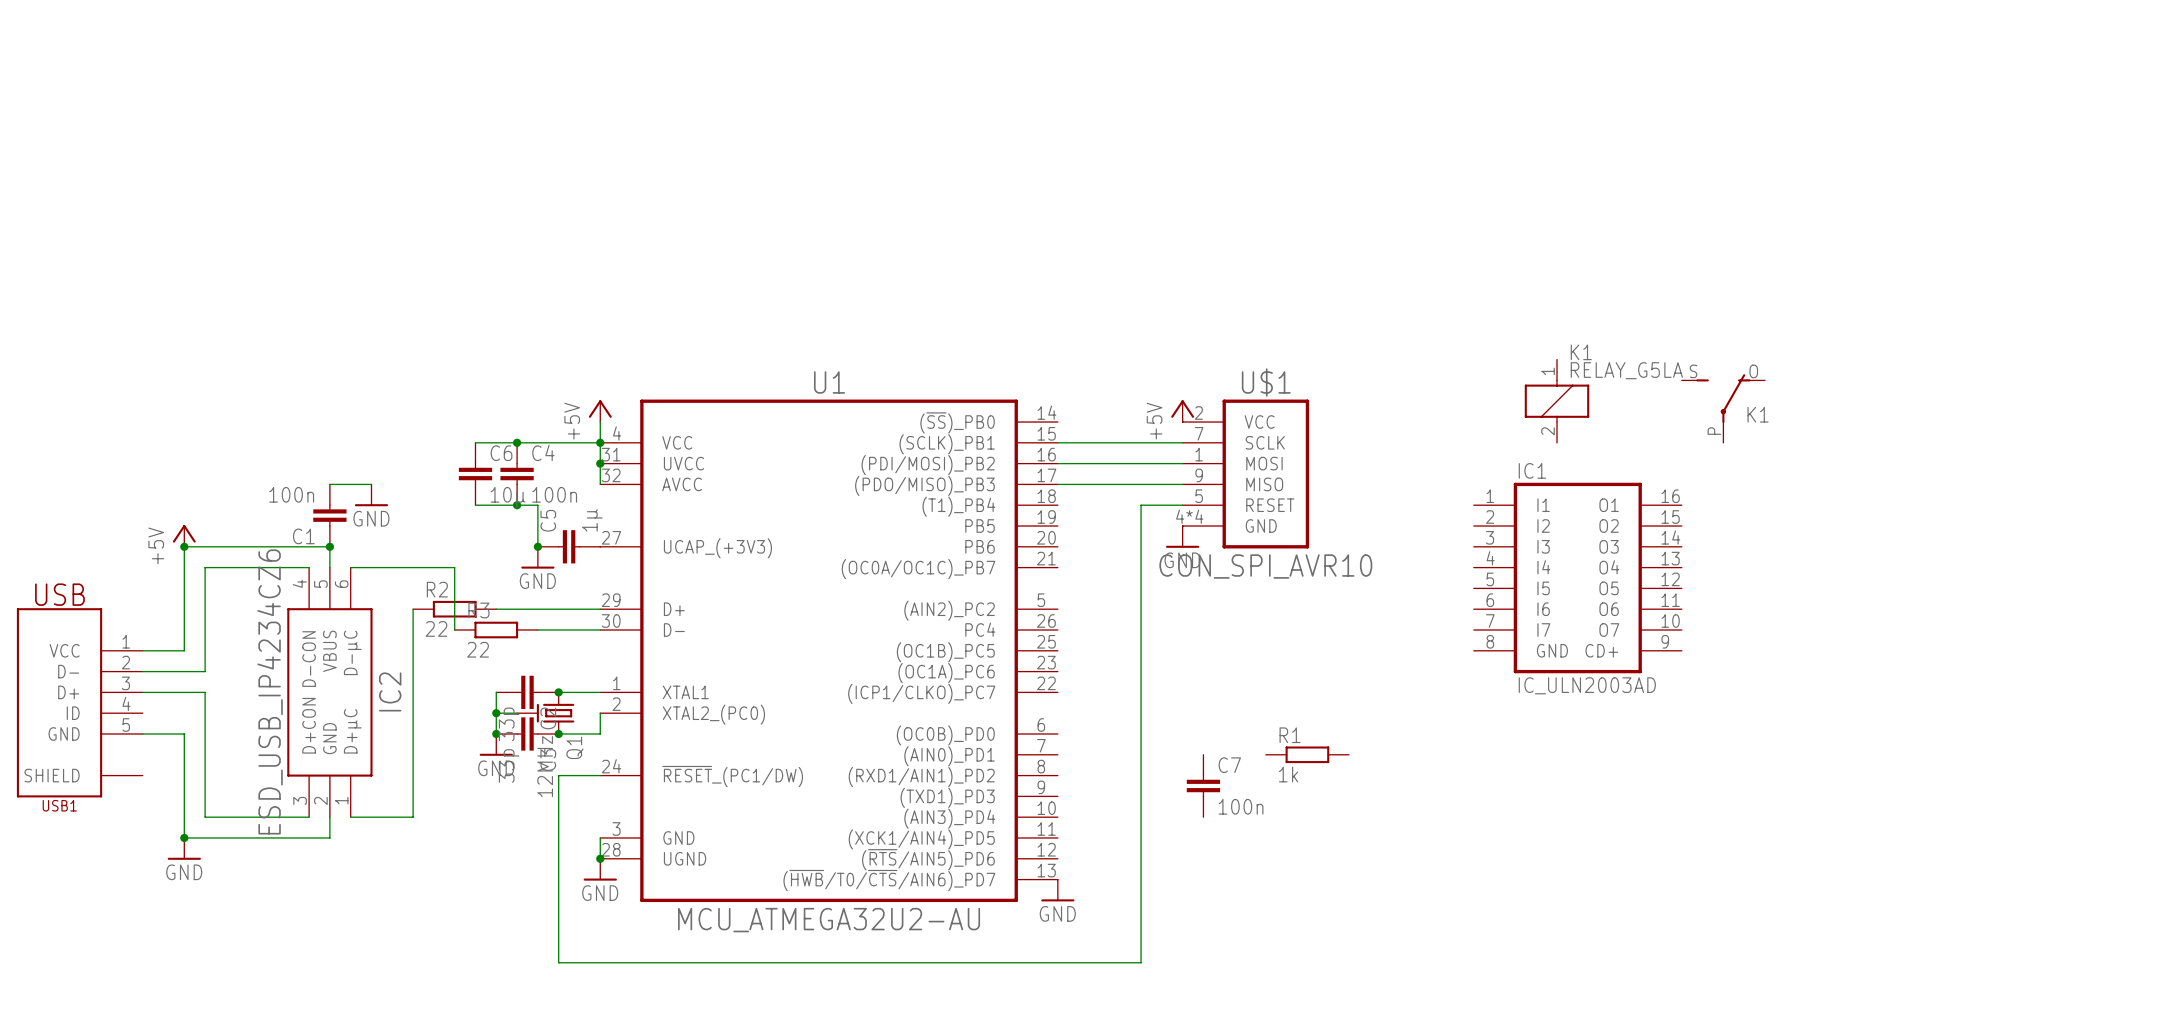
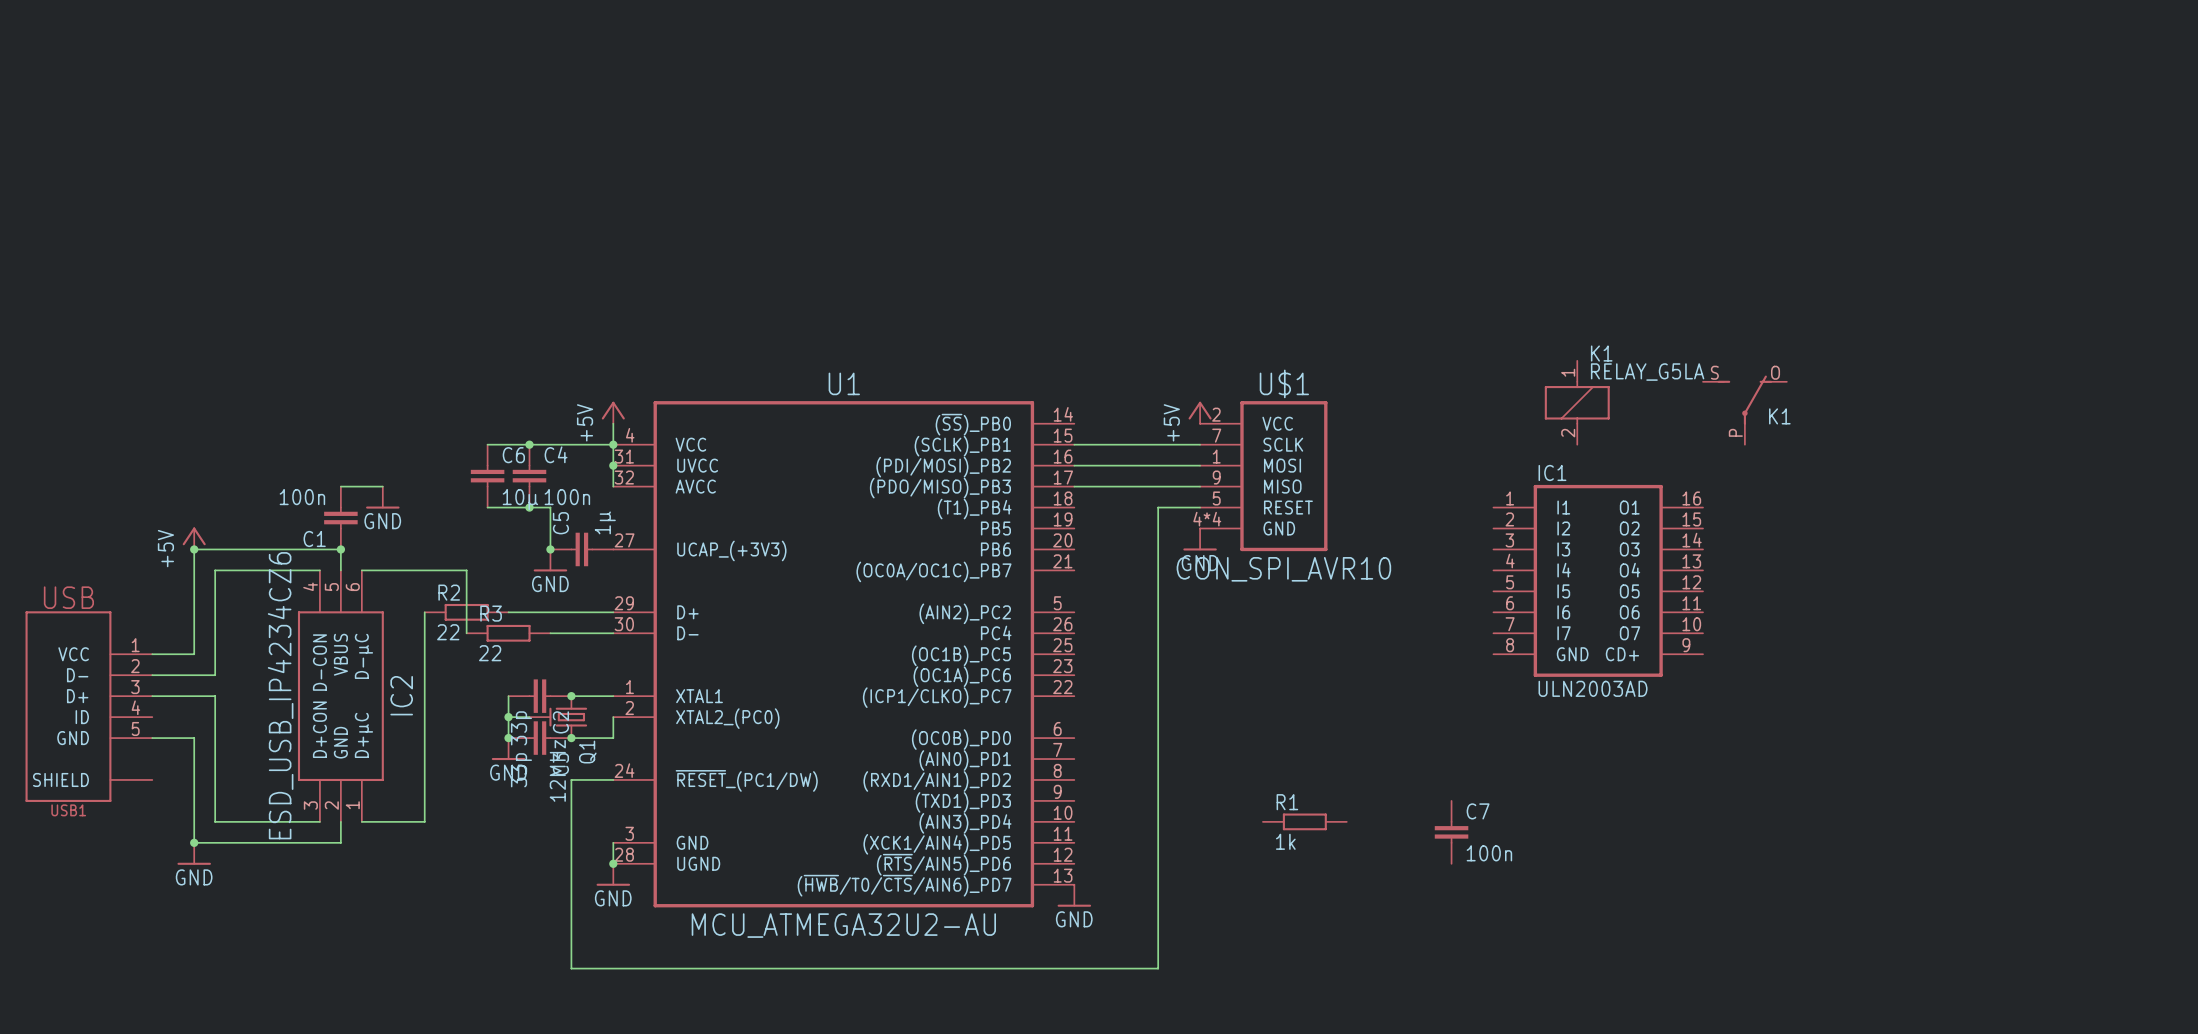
IC1 value: IC_ULN2003AD (1587, 685) -> ULN2003AD (1593, 688)
R1 position: (1307, 754) -> (1304, 821)
C7 position: (1203, 785) -> (1451, 832)

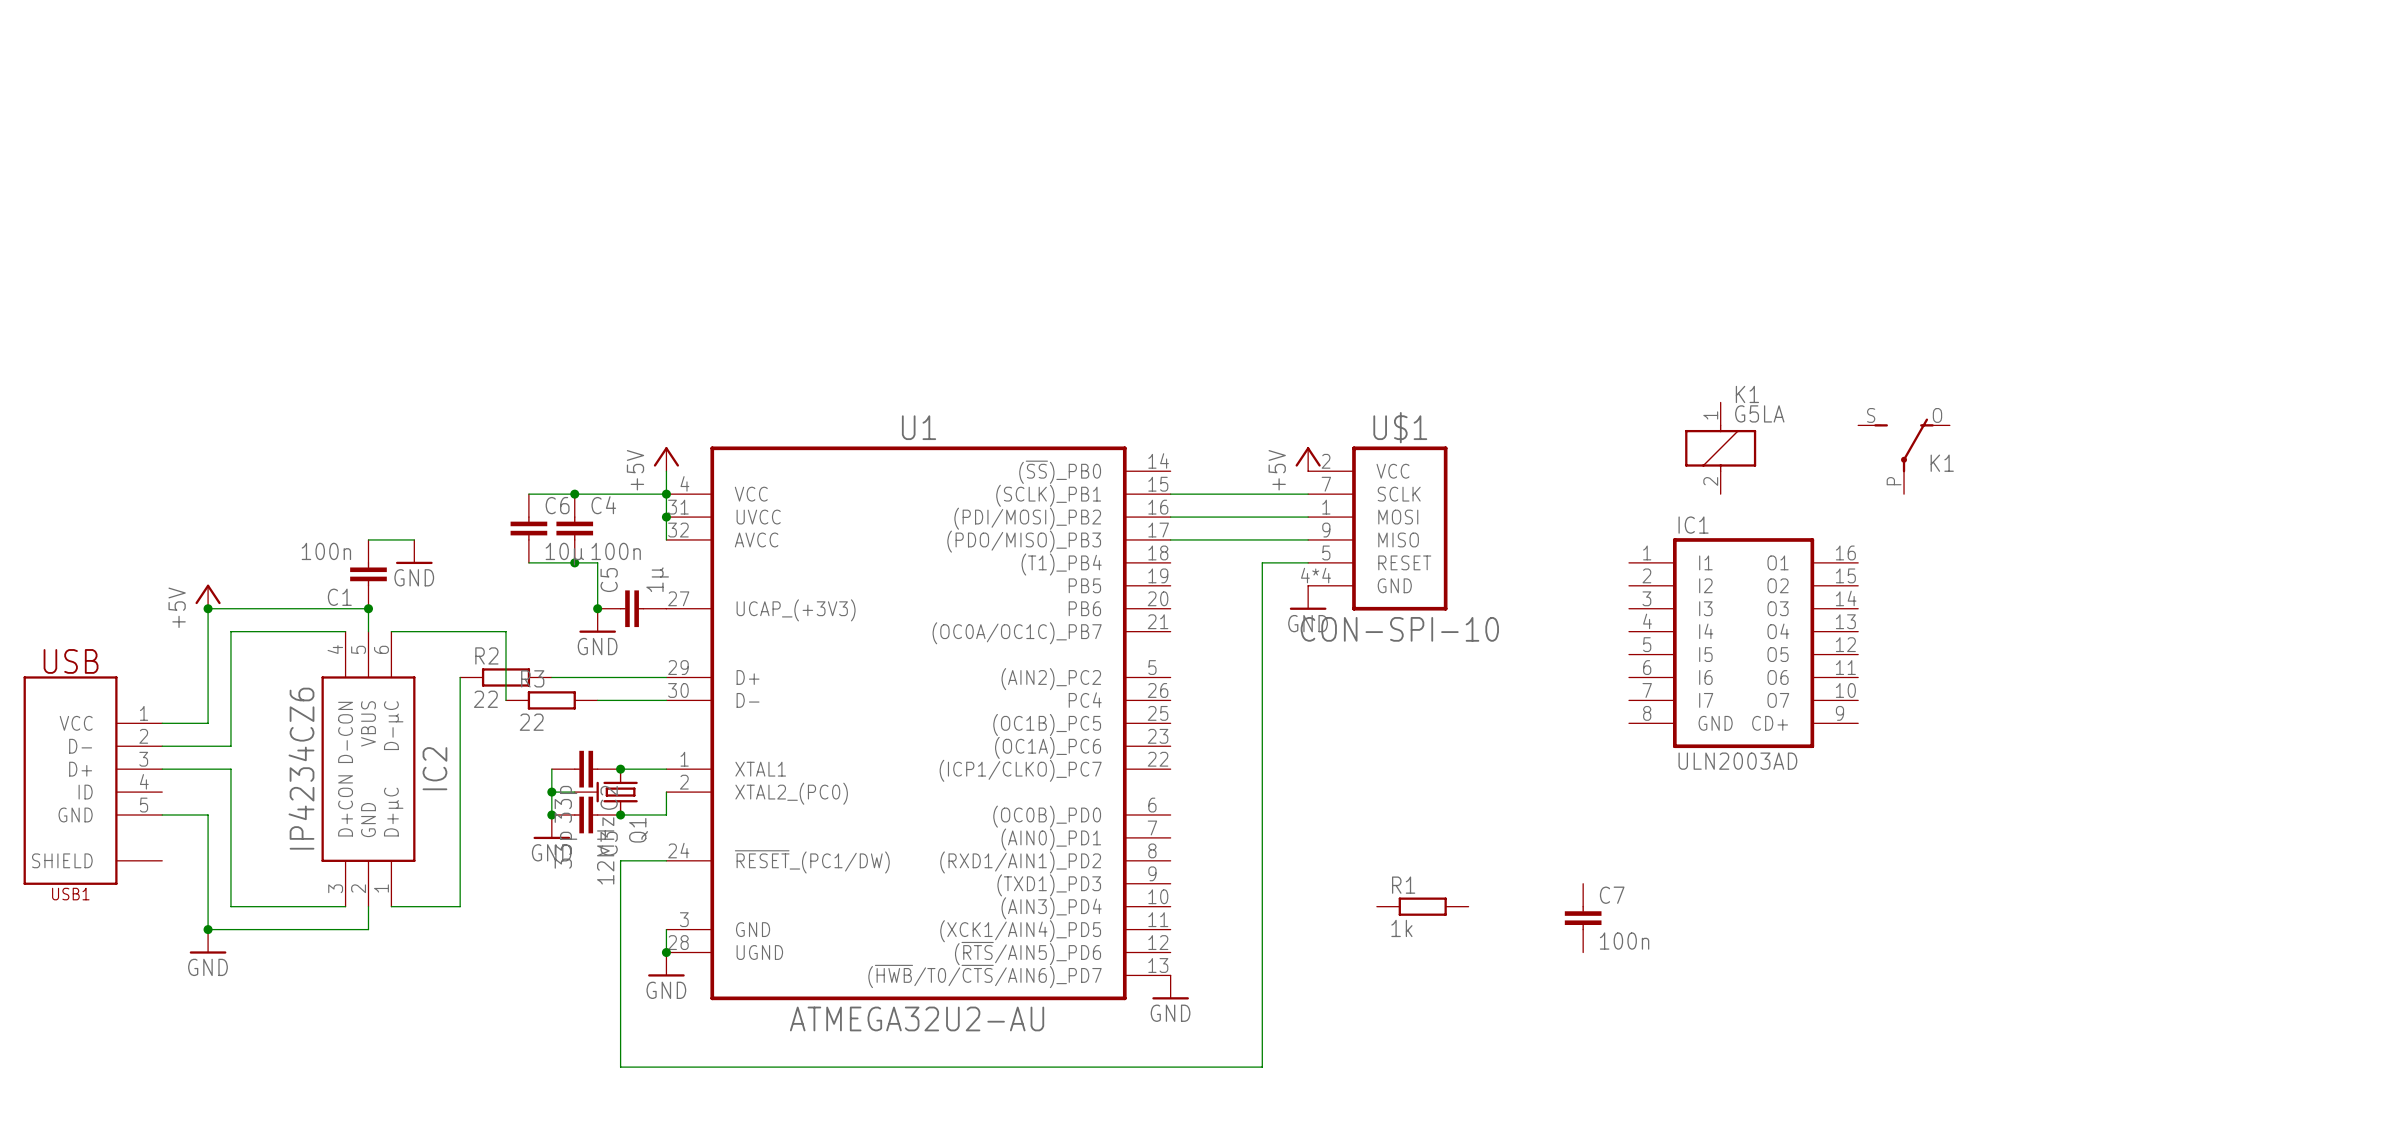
K1 value: RELAY_G5LA (1647, 372) -> G5LA (1759, 413)
U$1 value: CON_SPI_AVR10 (1283, 569) -> CON-SPI-10 (1399, 629)
IC2 value: ESD_USB_IP4234CZ6 (280, 695) -> IP4234CZ6 (301, 768)
U1 value: MCU_ATMEGA32U2-AU (843, 925) -> ATMEGA32U2-AU (917, 1018)

